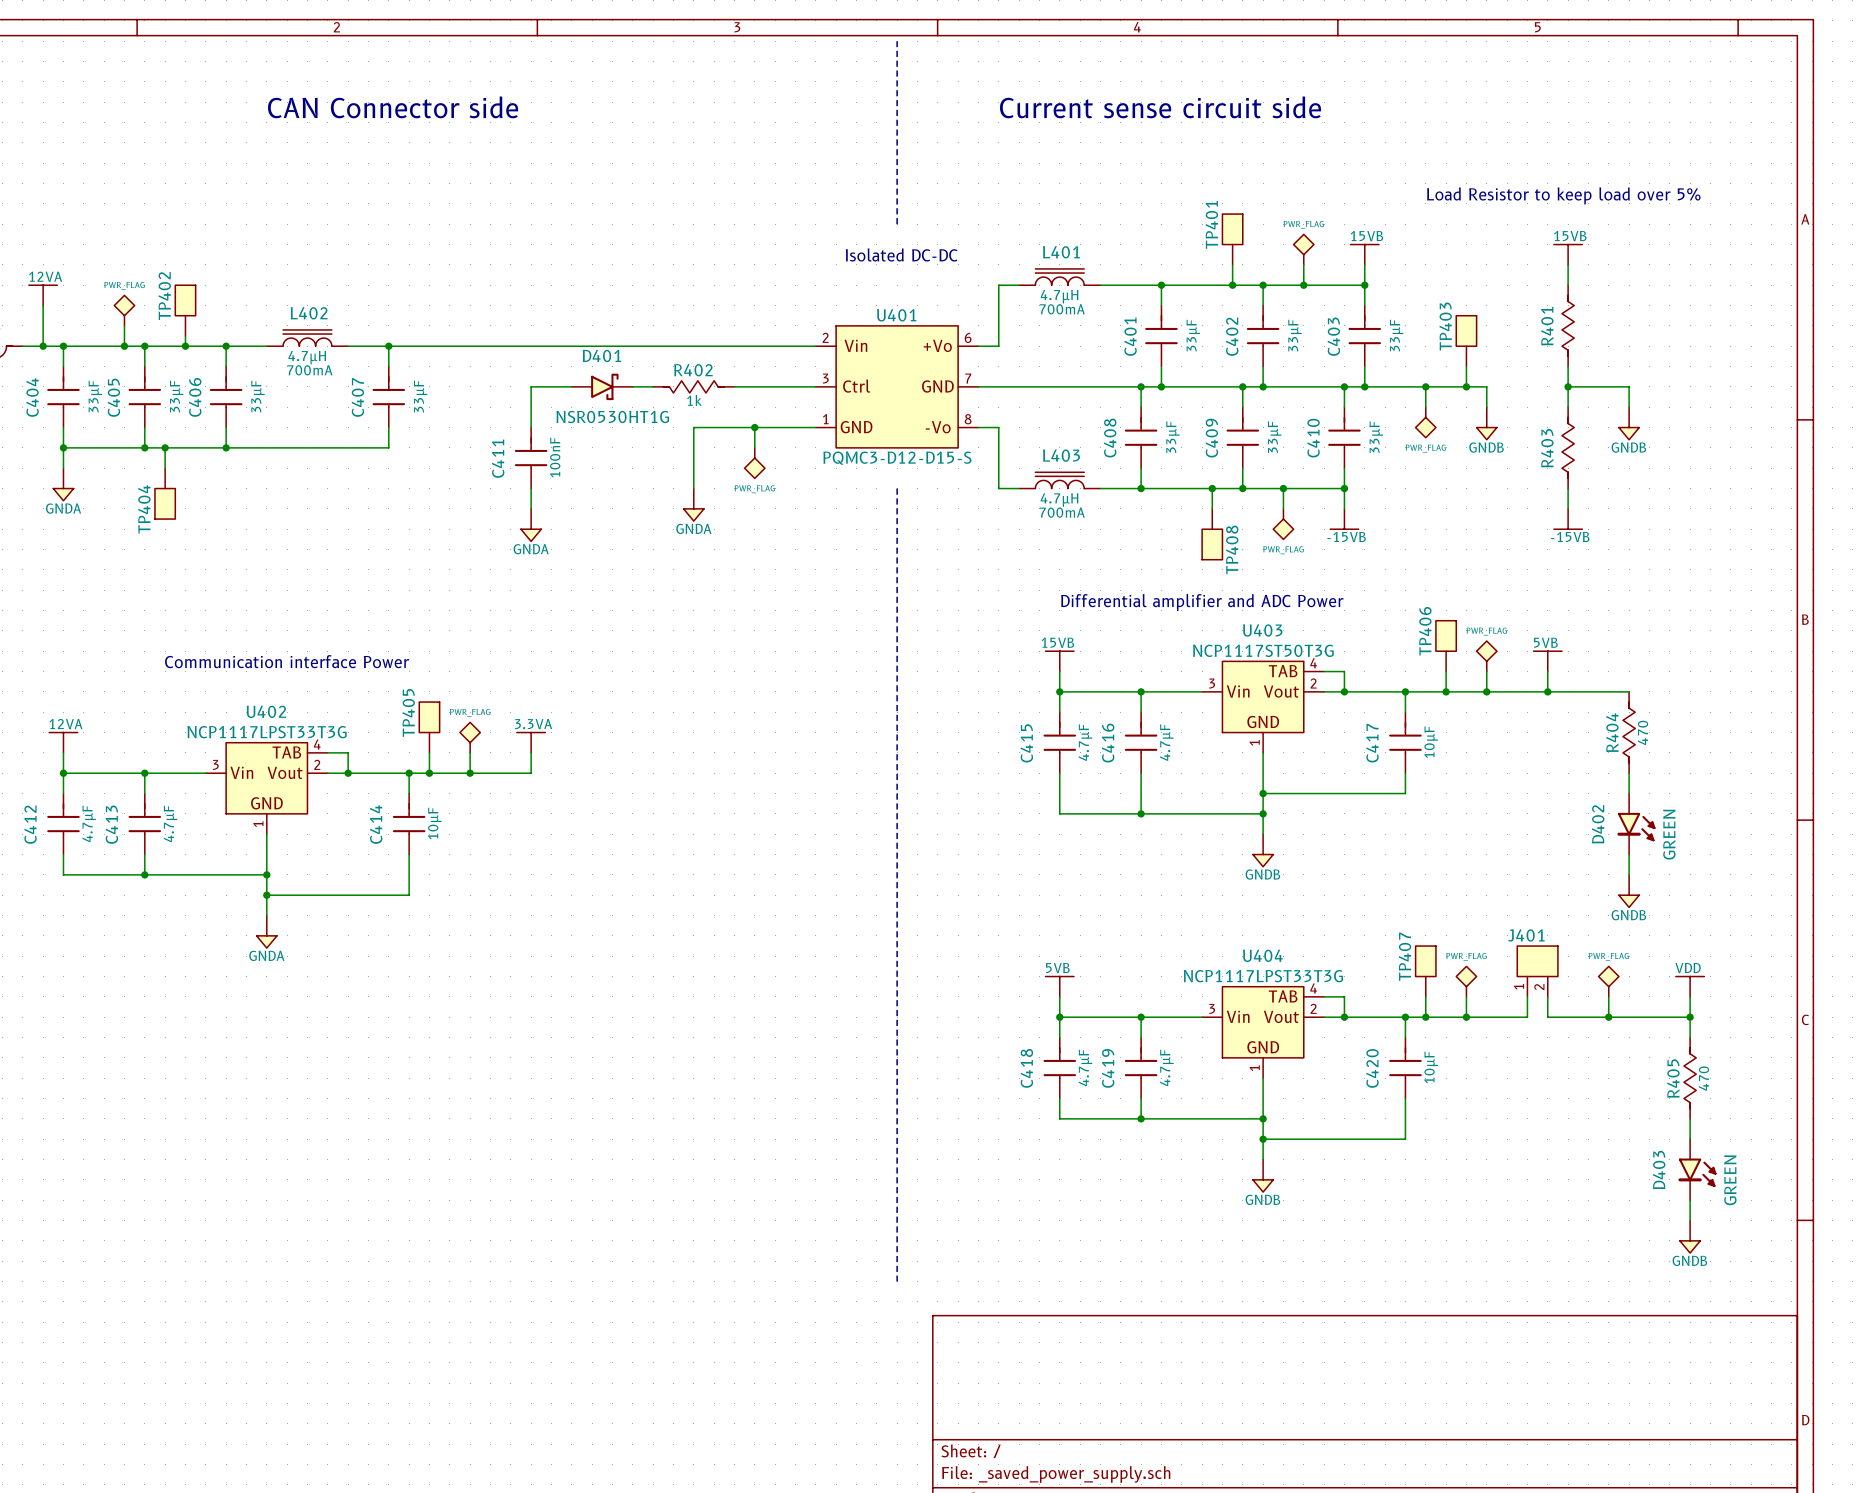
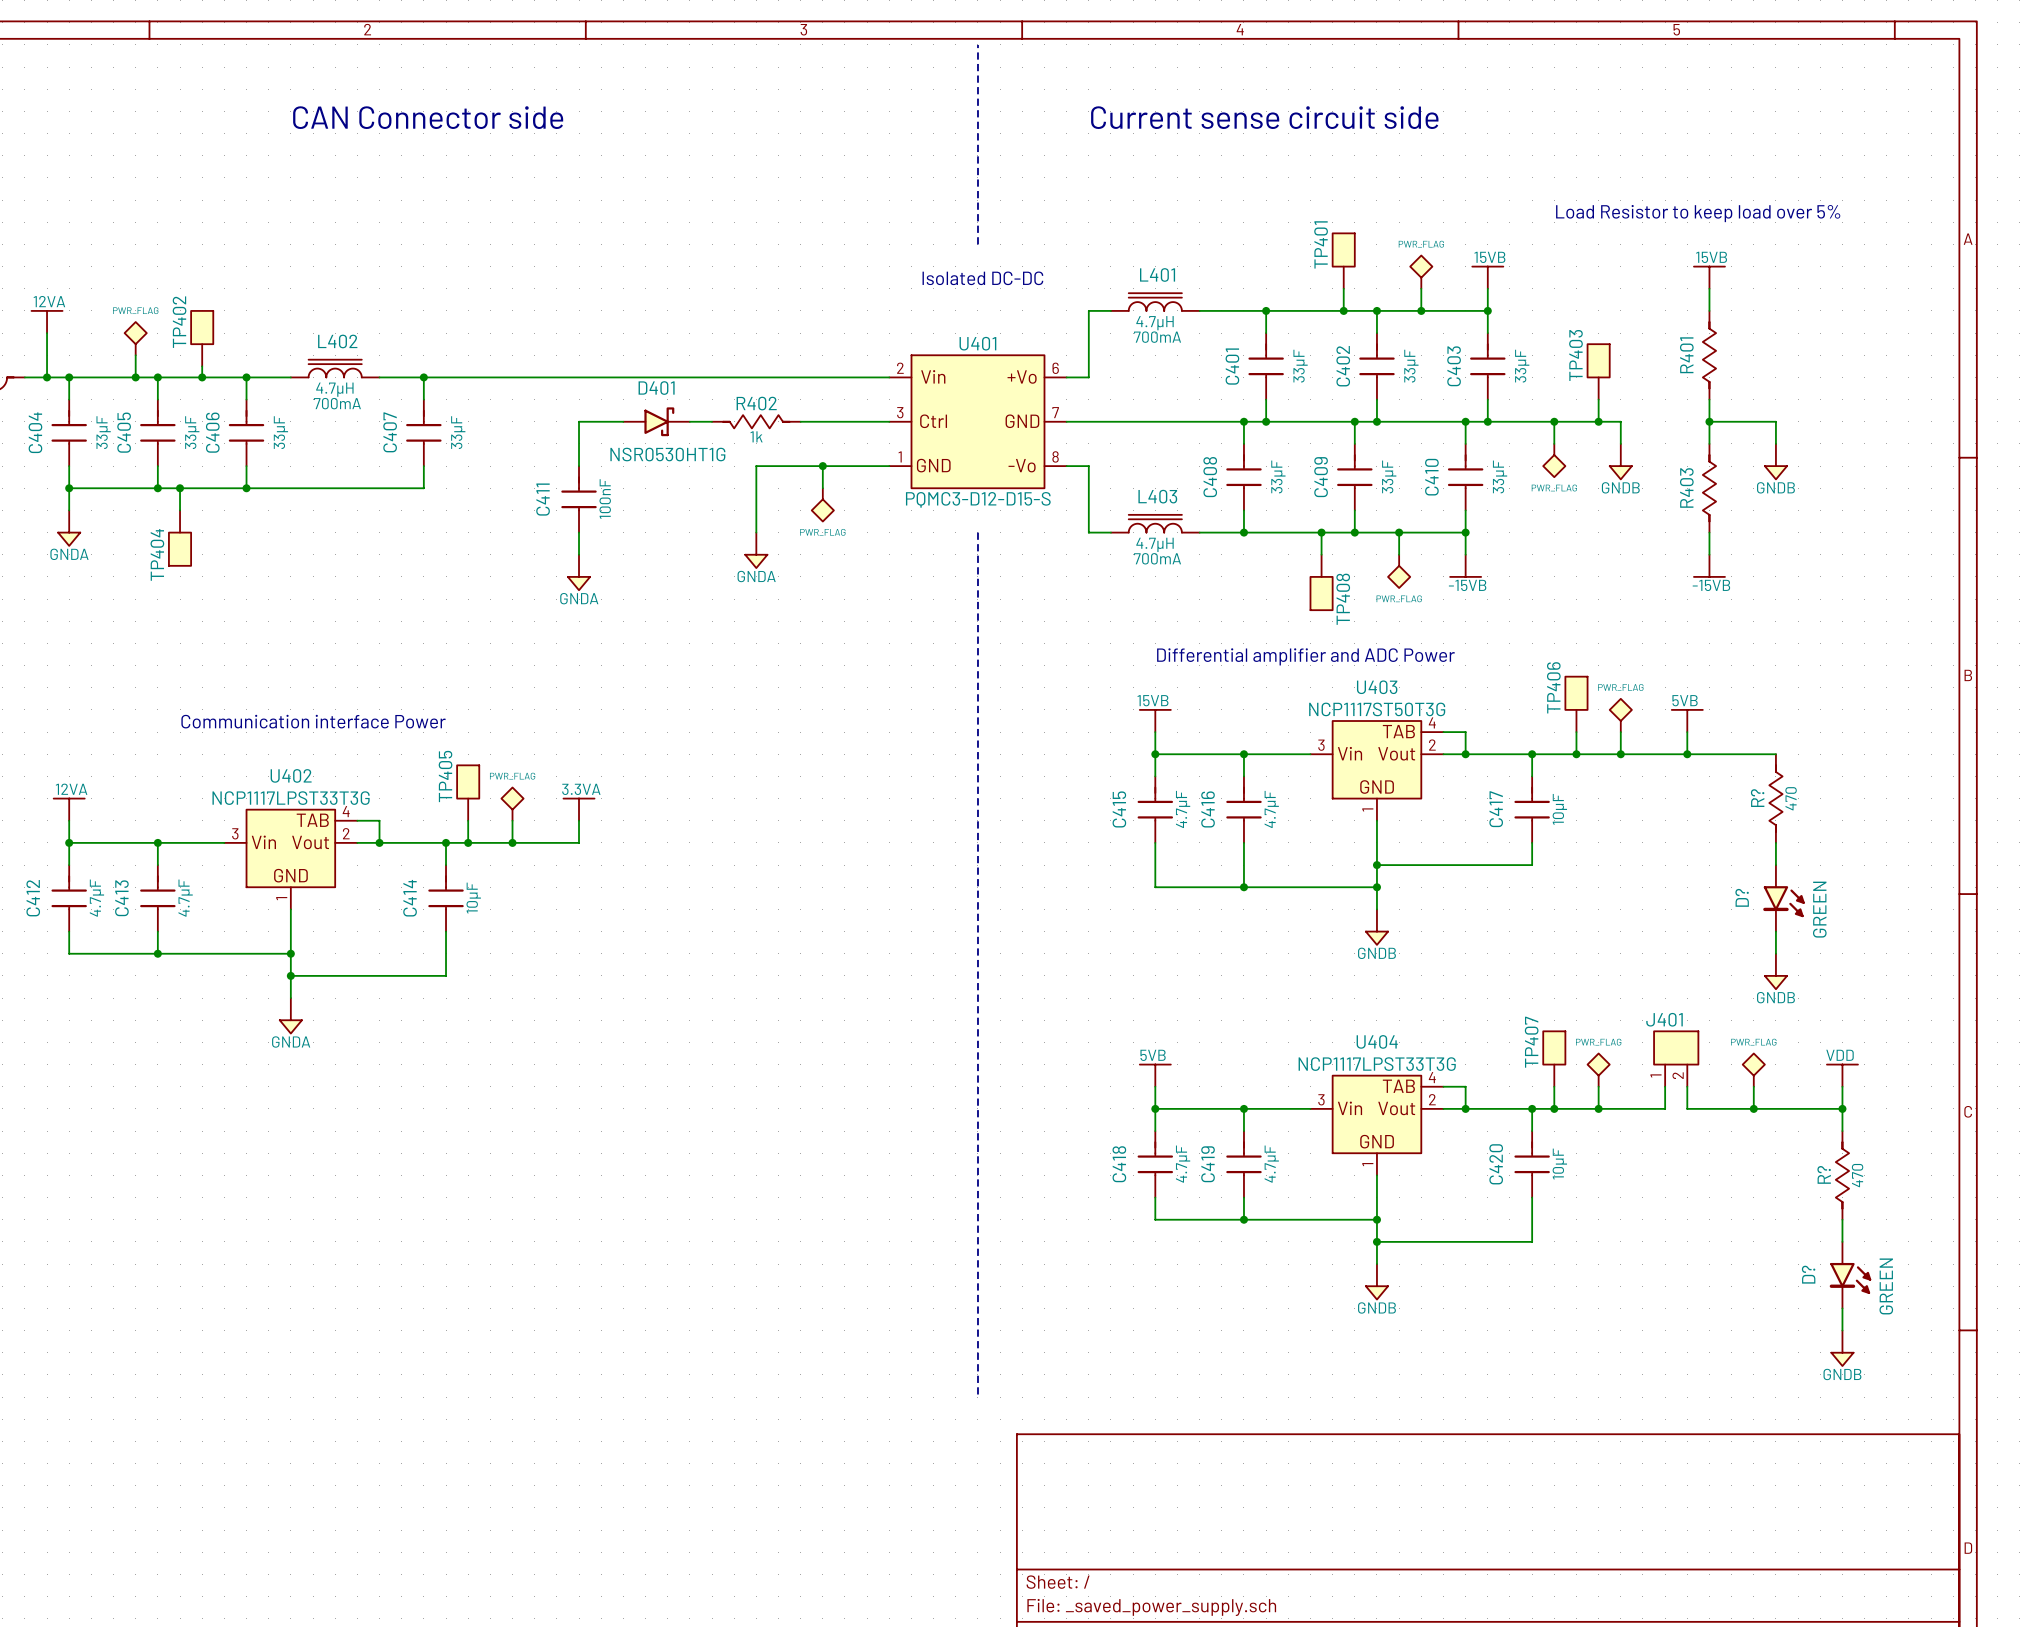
R404 name: R404 (1612, 732) -> R? (1757, 798)
D402 name: D402 (1598, 824) -> D? (1742, 897)
R405 name: R405 (1673, 1078) -> R? (1824, 1174)
D403 name: D403 (1659, 1169) -> D? (1808, 1274)

